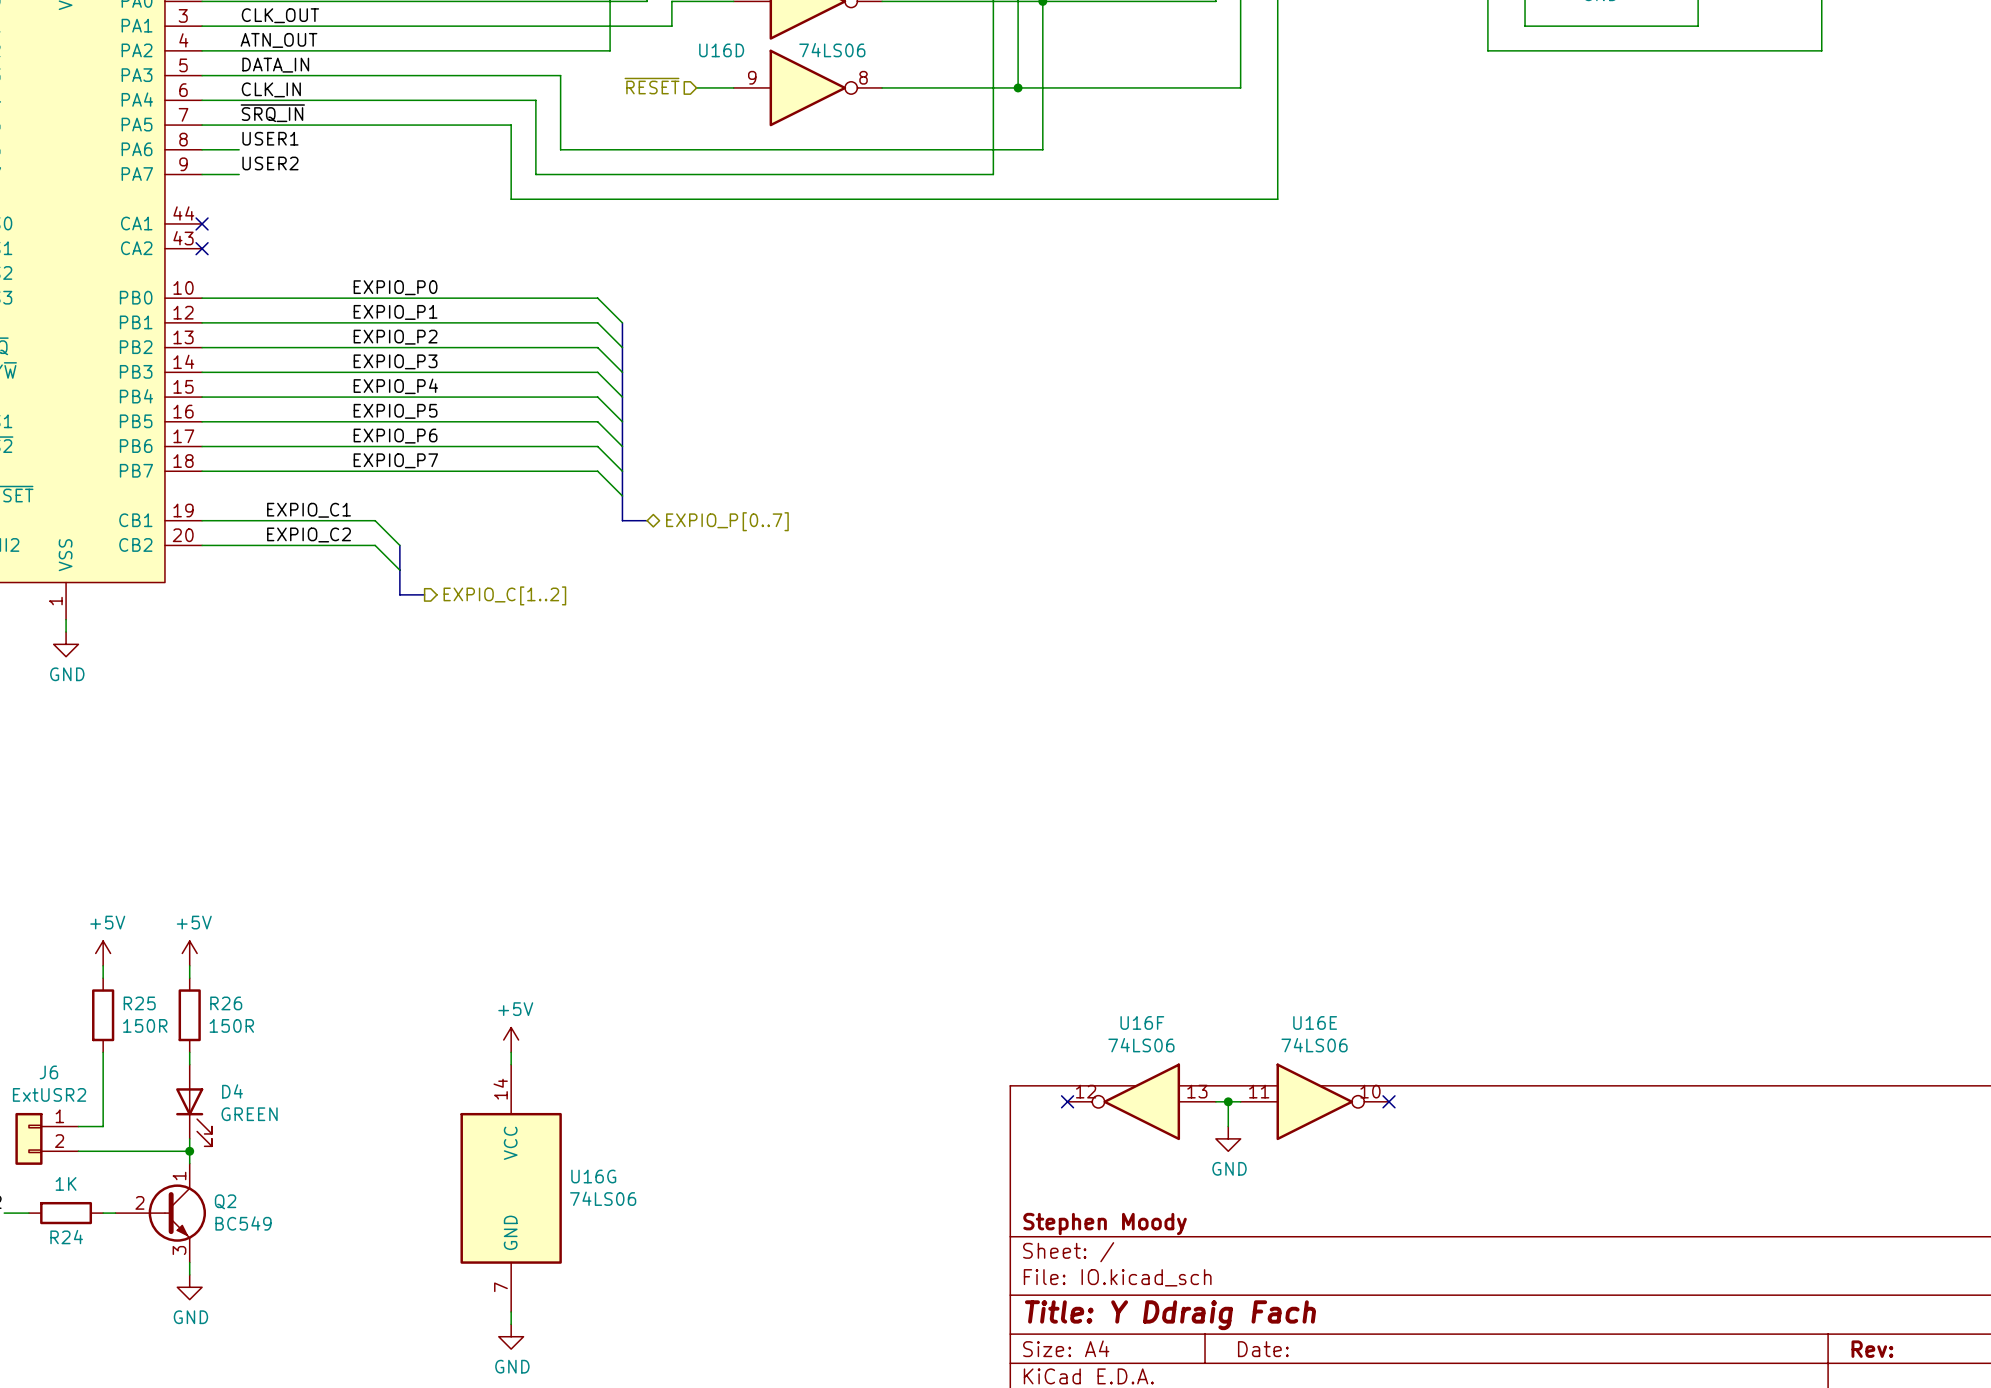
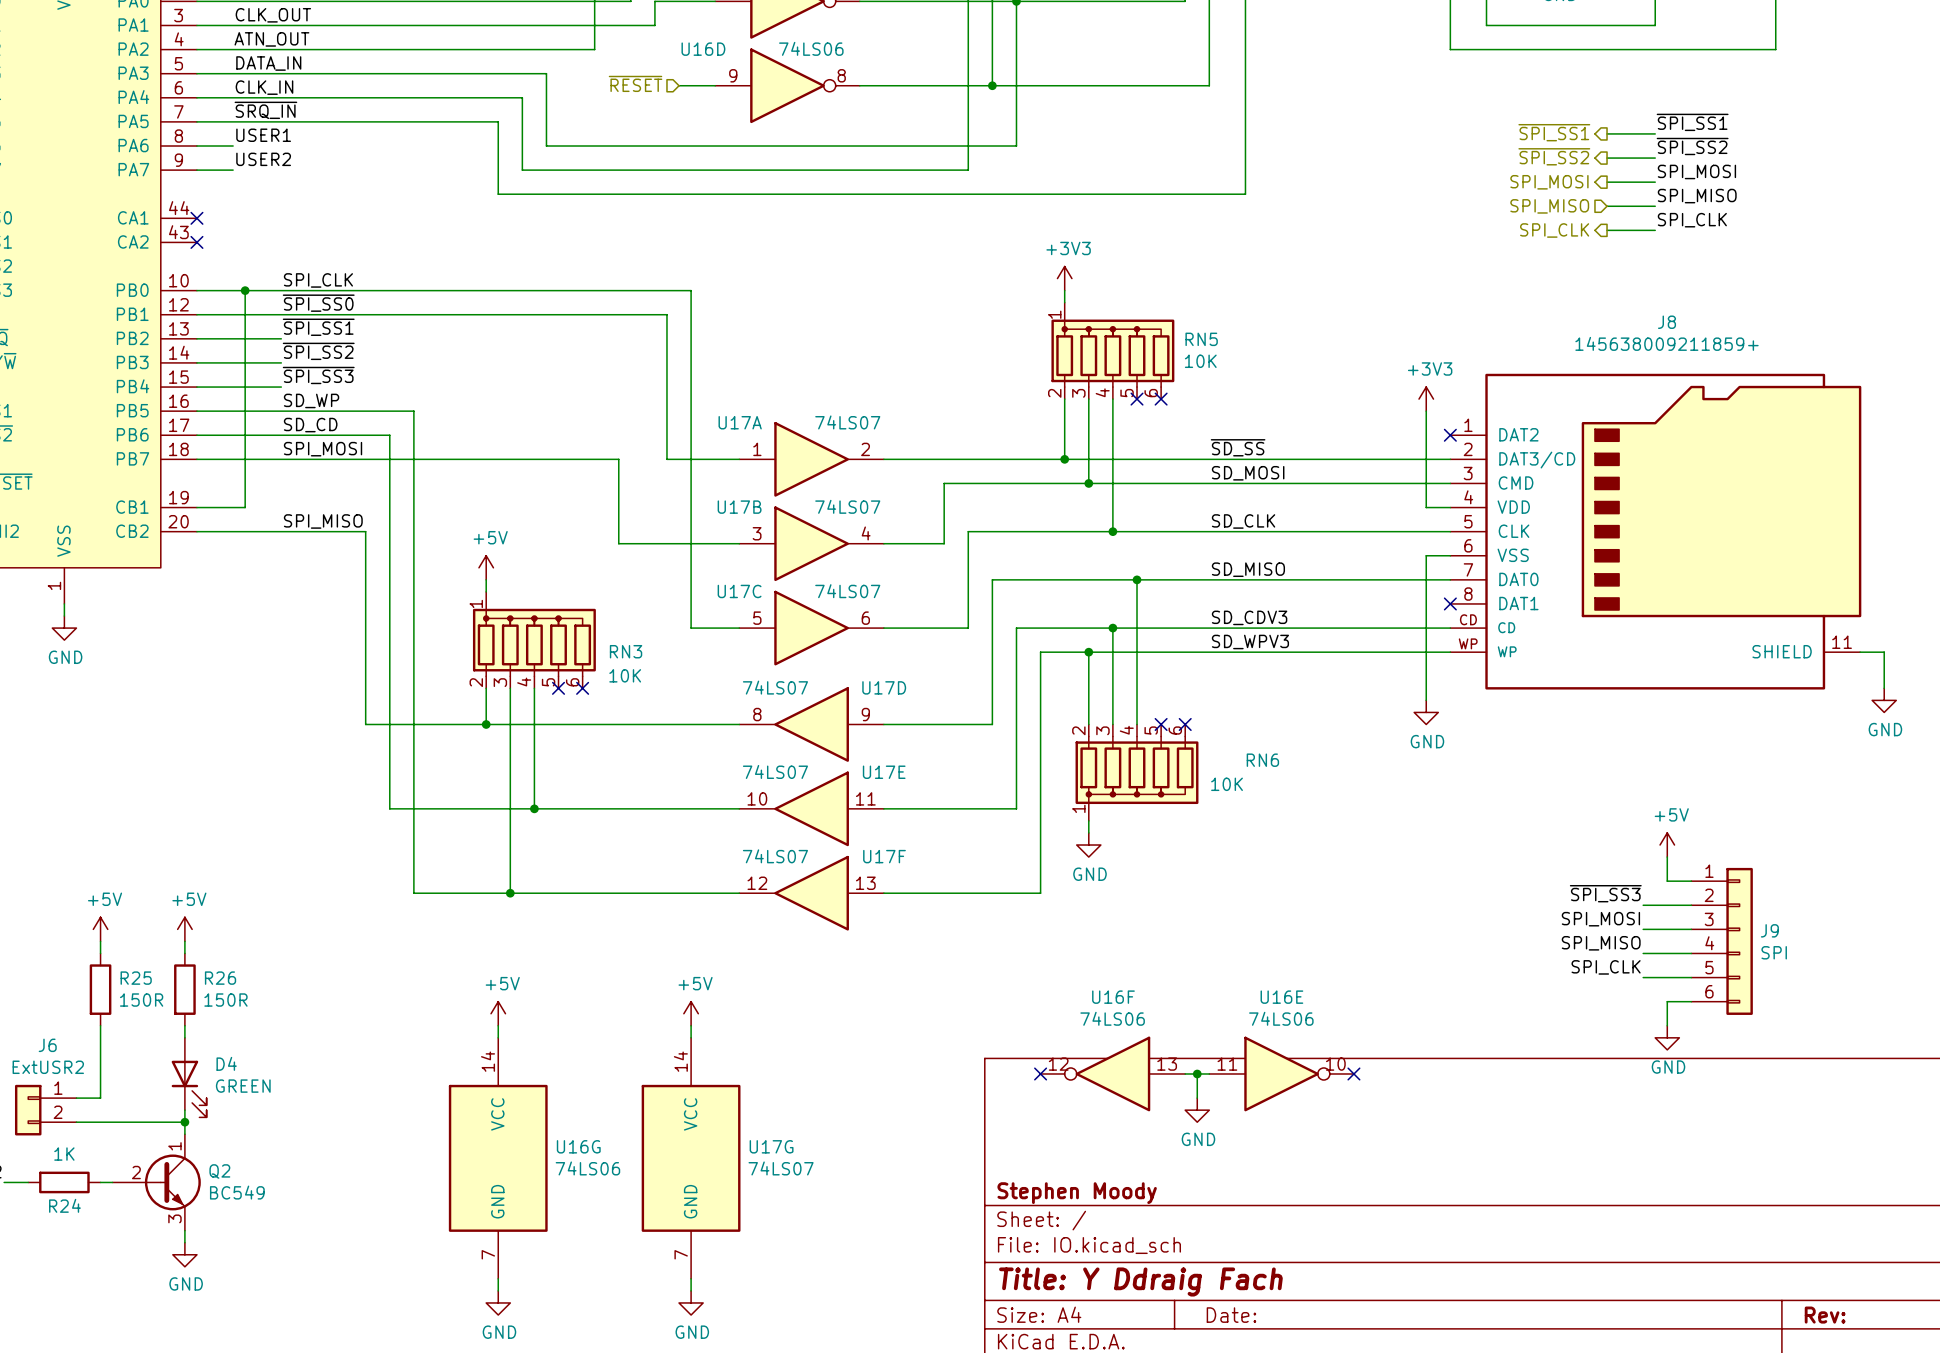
label: none -> ~{SPI_SS1} (1692, 122)
hierarchical label: none -> ~{SPI_SS1} (1554, 132)
wire: none -> (1607, 133) (1655, 133)
label: none -> ~{SPI_SS2} (1692, 146)
hierarchical label: none -> ~{SPI_SS2} (1554, 156)
wire: none -> (1607, 158) (1655, 158)
label: none -> SPI_MOSI (1696, 171)
wire: none -> (1607, 182) (1655, 182)
hierarchical label: none -> SPI_MOSI (1549, 182)
label: none -> SPI_MISO (1697, 196)
hierarchical label: none -> SPI_MISO (1549, 206)
wire: none -> (1607, 206) (1655, 206)
label: none -> SPI_CLK (1692, 220)
hierarchical label: none -> SPI_CLK (1554, 230)
wire: none -> (1607, 230) (1655, 230)
power symbol: none -> +3V3 (1064, 278)
label: none -> SPI_CLK (318, 280)
label: EXPIO_P0 (395, 287) -> none
junction: none -> (245, 290)
wire: (597, 298) (622, 322) -> (582, 290) (691, 290) (691, 628) (739, 628)
wire: none -> (1064, 290) (1064, 302)
label: none -> ~{SPI_SS0} (318, 303)
label: EXPIO_P1 (395, 312) -> none
wire: (597, 322) (622, 347) -> (582, 314) (666, 314) (666, 459) (739, 459)
bus: (622, 322) (622, 520) (647, 520) -> none
label: none -> ~{SPI_SS1} (318, 327)
label: EXPIO_P2 (395, 337) -> none
wire: (288, 347) (597, 347) (622, 372) -> none
RN5: none -> 10K (1112, 350)
label: none -> ~{SPI_SS2} (318, 351)
label: EXPIO_P3 (395, 361) -> none
wire: (288, 372) (597, 372) (622, 397) -> none
label: none -> ~{SPI_SS3} (318, 375)
label: EXPIO_P4 (395, 386) -> none
wire: (288, 397) (597, 397) (622, 421) -> none
wire: none -> (1064, 399) (1064, 459)
wire: none -> (1088, 399) (1088, 483)
wire: none -> (1112, 399) (1112, 531)
no-connect mark: none -> (1137, 399)
no-connect mark: none -> (1161, 399)
power symbol: none -> +3V3 (1426, 399)
label: none -> SD_WP (311, 400)
label: EXPIO_P5 (395, 411) -> none
wire: (424, 421) (597, 421) (622, 446) -> (413, 411) (413, 893) (739, 893)
wire: none -> (1426, 411) (1426, 507) (1450, 507)
label: none -> SD_CD (310, 425)
label: EXPIO_P6 (395, 436) -> none
wire: (399, 446) (597, 446) (622, 471) -> (389, 435) (389, 808) (739, 808)
no-connect mark: none -> (1450, 435)
label: none -> ~{SD_SS} (1238, 447)
label: none -> SPI_MOSI (323, 449)
label: EXPIO_P7 (395, 460) -> none
wire: (597, 471) (622, 495) -> (582, 459) (618, 459) (618, 543) (739, 543)
U17A: none -> 74LS07 (811, 459)
wire: none -> (883, 459) (1450, 459)
junction: none -> (1064, 459)
label: none -> SD_MOSI (1248, 473)
junction: none -> (1088, 483)
wire: none -> (1450, 483) (944, 483) (944, 543) (883, 543)
label: EXPIO_C1 (309, 510) -> none
wire: (251, 520) (375, 520) (399, 545) -> (245, 507) (245, 290)
hierarchical label: EXPIO_P[0..7] (727, 521) -> none
label: EXPIO_C2 (309, 534) -> none
label: none -> SPI_MISO (323, 521)
label: none -> SD_CLK (1243, 521)
wire: (375, 545) (399, 570) -> (365, 531) (365, 724) (739, 724)
bus: (399, 545) (399, 594) (424, 594) -> none
junction: none -> (1112, 531)
wire: none -> (1450, 531) (968, 531) (968, 628) (883, 628)
J8: none -> 145638009211859+ (1655, 531)
U17B: none -> 74LS07 (811, 543)
wire: none -> (1450, 555) (1426, 555) (1426, 700)
power symbol: none -> +5V (486, 567)
label: none -> SD_MISO (1248, 569)
wire: none -> (486, 579) (486, 591)
wire: none -> (1137, 579) (1137, 724)
junction: none -> (1137, 579)
wire: none -> (1450, 579) (992, 579) (992, 724) (883, 724)
hierarchical label: EXPIO_C[1..2] (504, 595) -> none
no-connect mark: none -> (1450, 603)
label: none -> SD_CDV3 (1249, 617)
U17C: none -> 74LS07 (811, 628)
wire: none -> (1112, 628) (1112, 724)
junction: none -> (1112, 628)
wire: none -> (1450, 628) (1016, 628) (1016, 808) (883, 808)
RN3: none -> 10K (534, 640)
label: none -> SD_WPV3 (1250, 642)
wire: none -> (1088, 652) (1088, 724)
junction: none -> (1088, 652)
wire: none -> (1450, 652) (1040, 652) (1040, 893) (883, 893)
wire: none -> (1860, 652) (1884, 652) (1884, 688)
wire: none -> (486, 688) (486, 724)
wire: none -> (510, 688) (510, 893)
wire: none -> (534, 688) (534, 808)
no-connect mark: none -> (558, 688)
no-connect mark: none -> (582, 688)
power symbol: none -> GND (1884, 700)
power symbol: none -> GND (1426, 712)
junction: none -> (486, 724)
U17D: none -> 74LS07 (811, 724)
no-connect mark: none -> (1161, 724)
no-connect mark: none -> (1185, 724)
RN6: none -> 10K (1137, 772)
junction: none -> (534, 808)
U17E: none -> 74LS07 (811, 808)
wire: none -> (1088, 820) (1088, 832)
power symbol: none -> GND (1088, 845)
power symbol: none -> +5V (1667, 845)
wire: none -> (1667, 857) (1667, 881) (1691, 881)
junction: none -> (510, 893)
U17F: none -> 74LS07 (811, 893)
label: none -> ~{SPI_SS3} (1605, 893)
wire: none -> (1643, 905) (1691, 905)
label: none -> SPI_MOSI (1600, 919)
wire: none -> (1643, 929) (1691, 929)
J9: none -> SPI (1722, 941)
label: none -> SPI_MISO (1601, 943)
wire: none -> (1643, 953) (1691, 953)
label: none -> SPI_CLK (1606, 967)
wire: none -> (1643, 977) (1691, 977)
wire: none -> (1691, 1001) (1667, 1001) (1667, 1025)
power symbol: none -> +5V (691, 1013)
wire: none -> (691, 1025) (691, 1037)
power symbol: none -> GND (1667, 1037)
U17G: none -> 74LS07 (691, 1158)
wire: none -> (691, 1278) (691, 1290)
power symbol: none -> GND (691, 1302)

